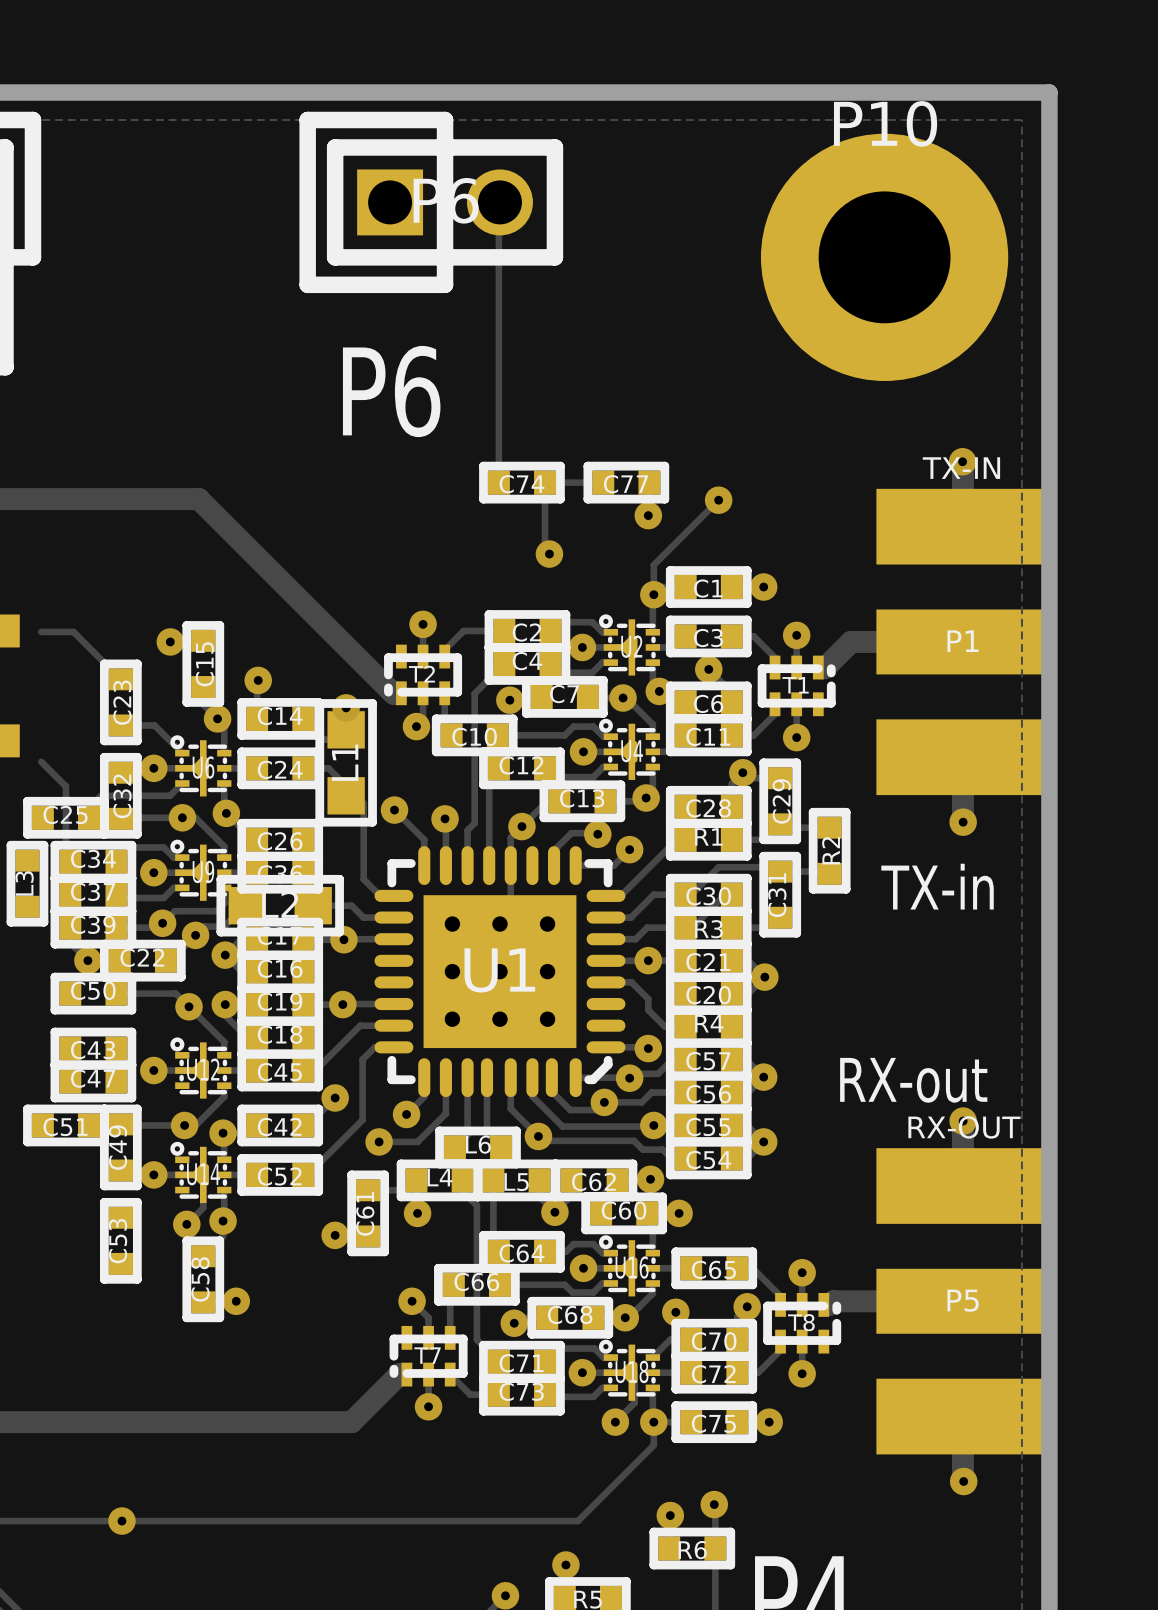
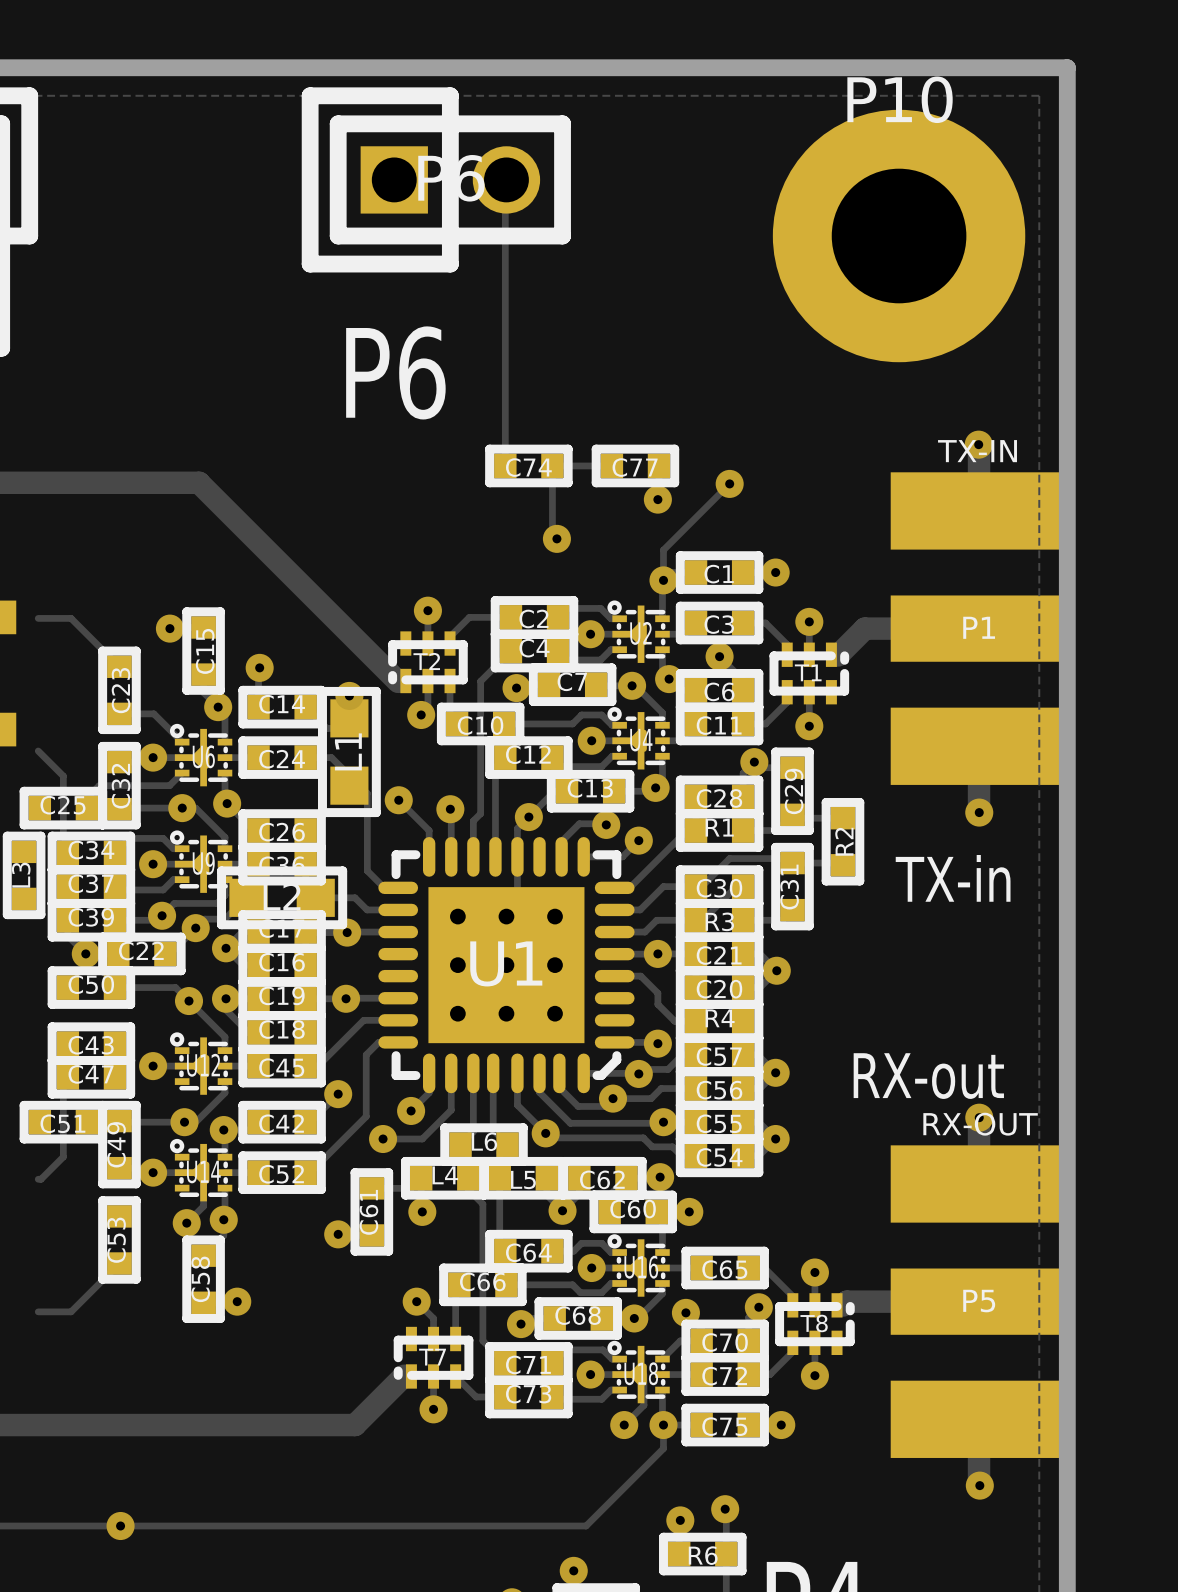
track: none -> (67, 1077) (63, 1081) (63, 1156) (41, 1179) (38, 1179)
track: none -> (119, 1263) (71, 1311) (38, 1311)

